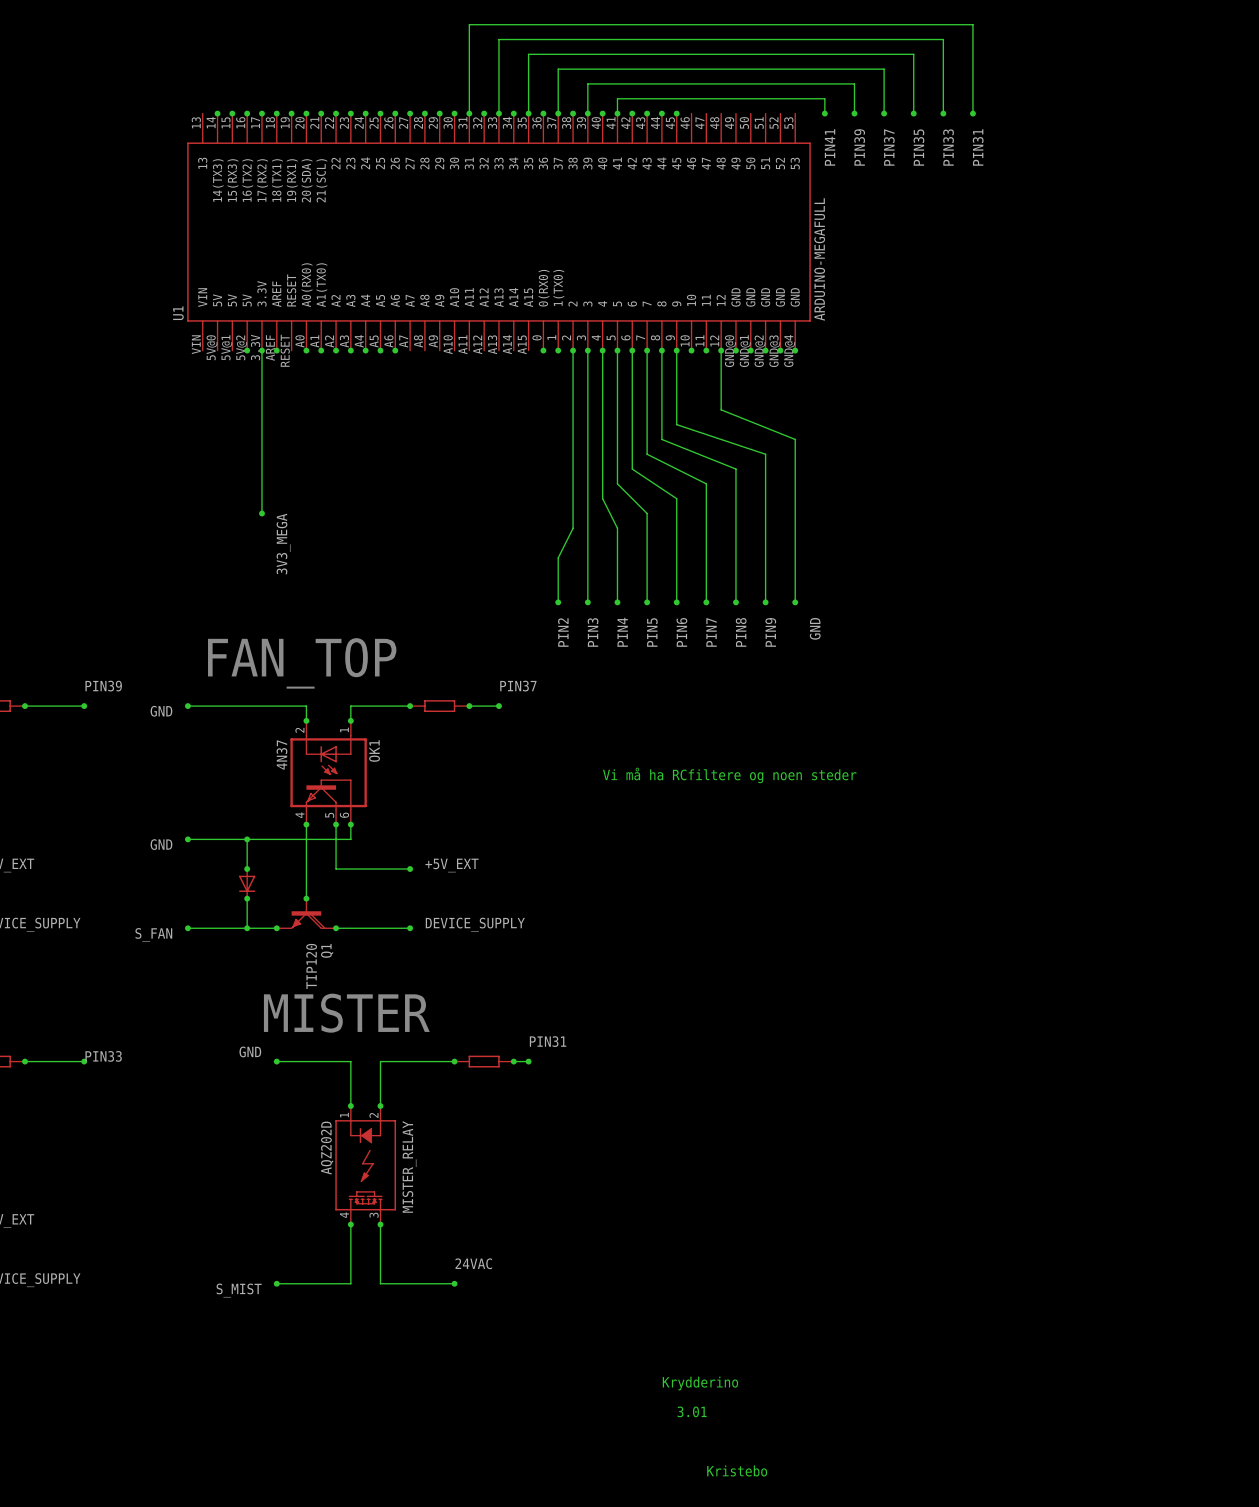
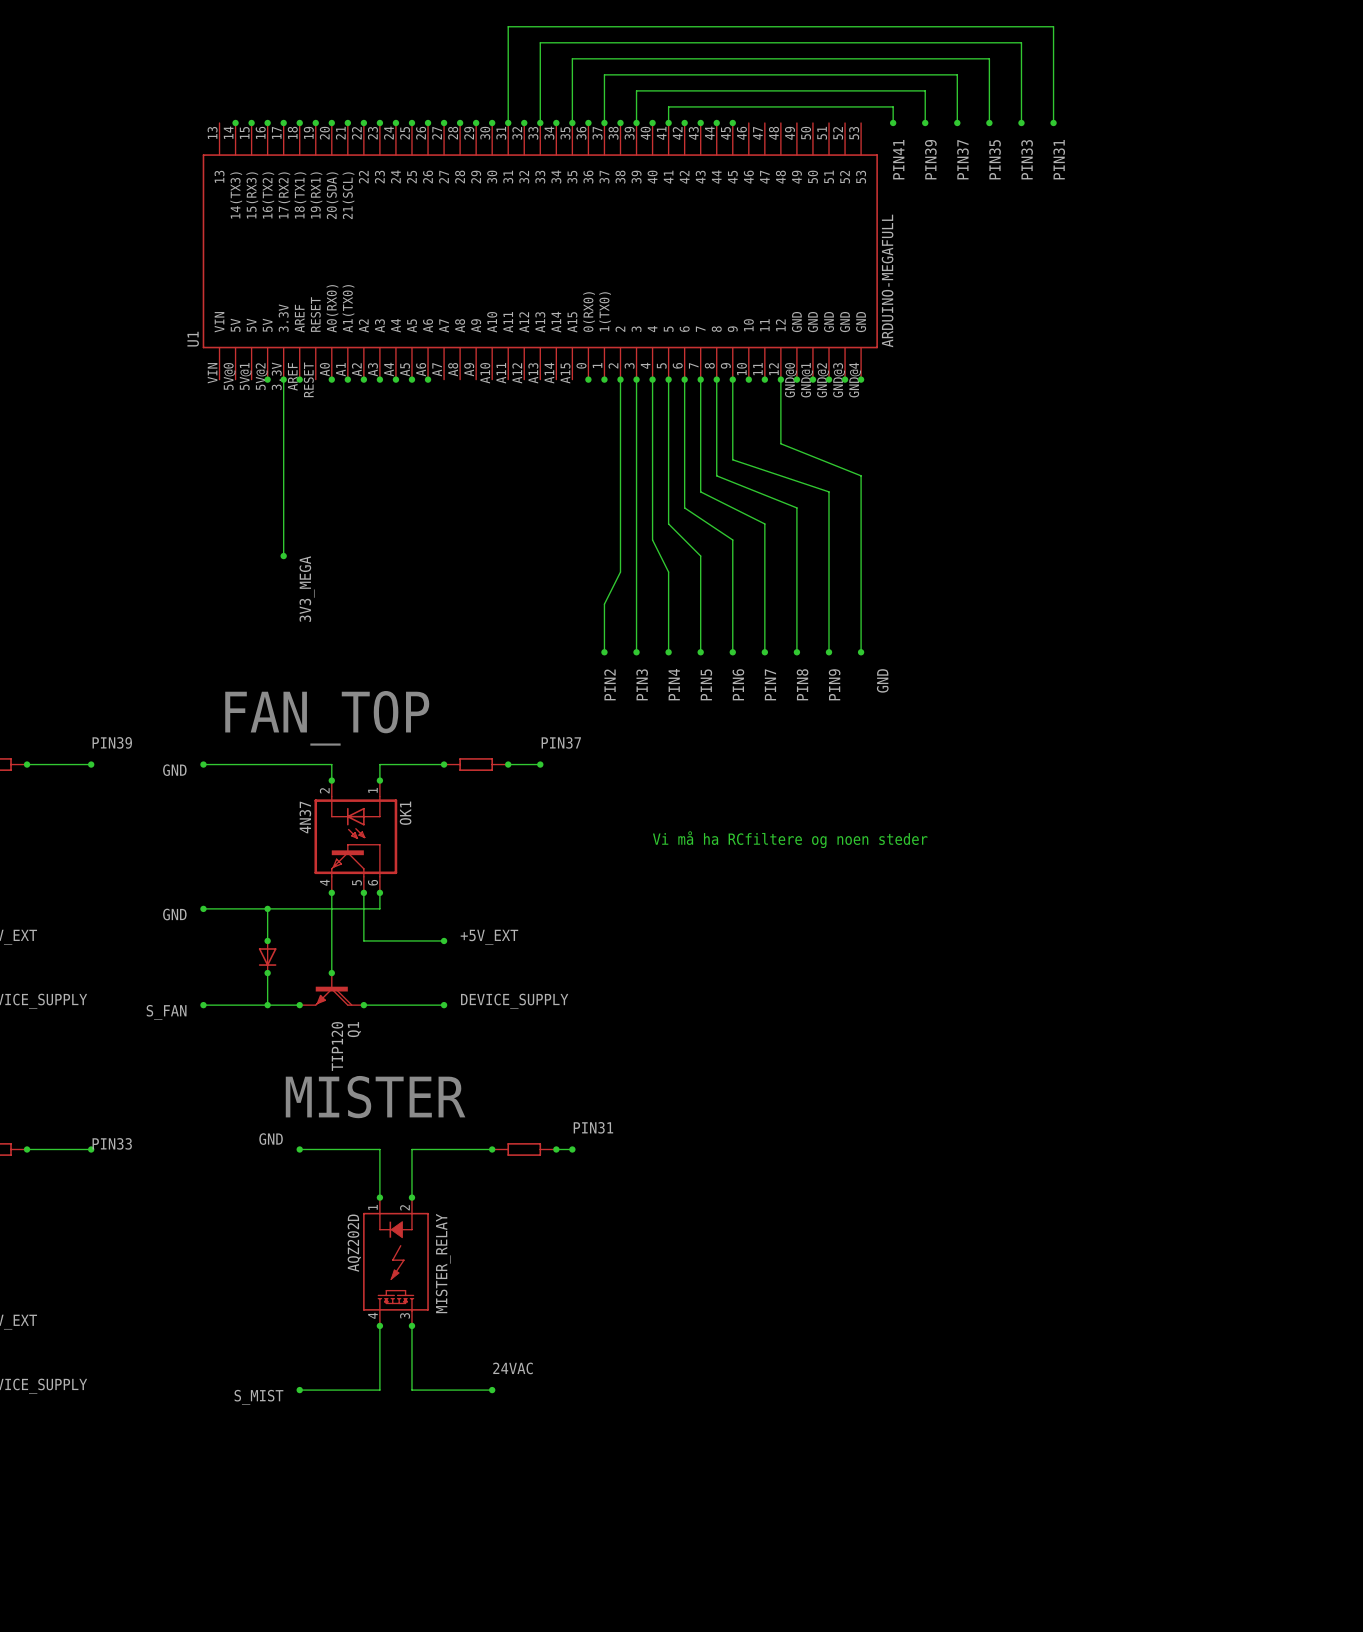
text: Krydderino (700, 1383) -> none
text: 3.01 (692, 1411) -> none
text: Kristebo (737, 1471) -> none

